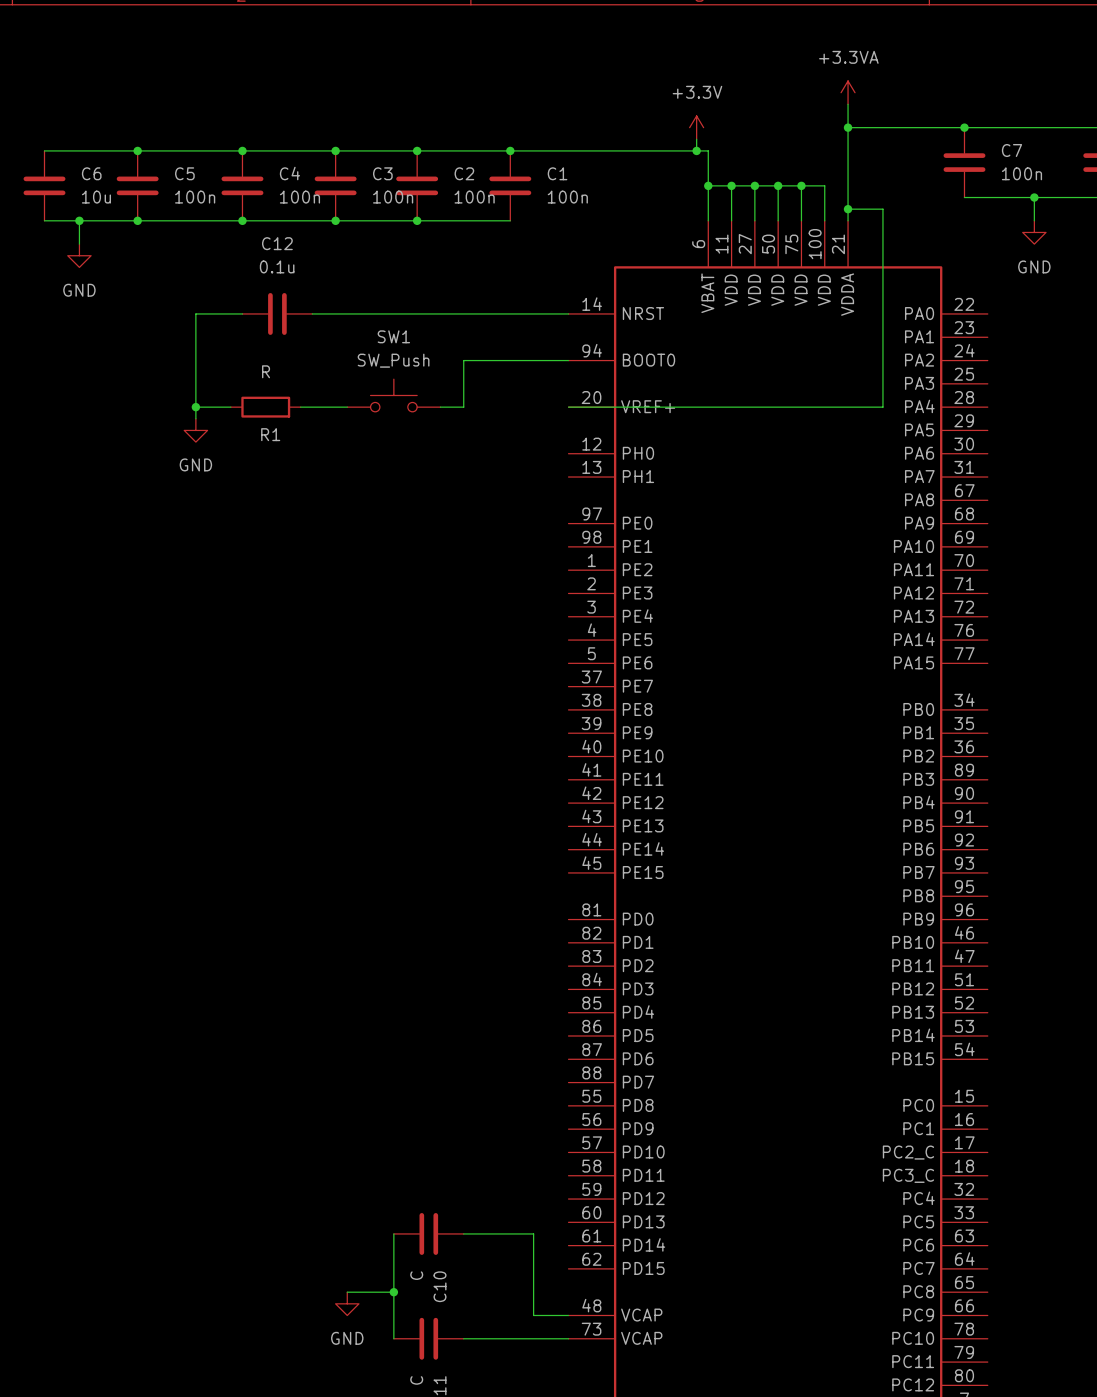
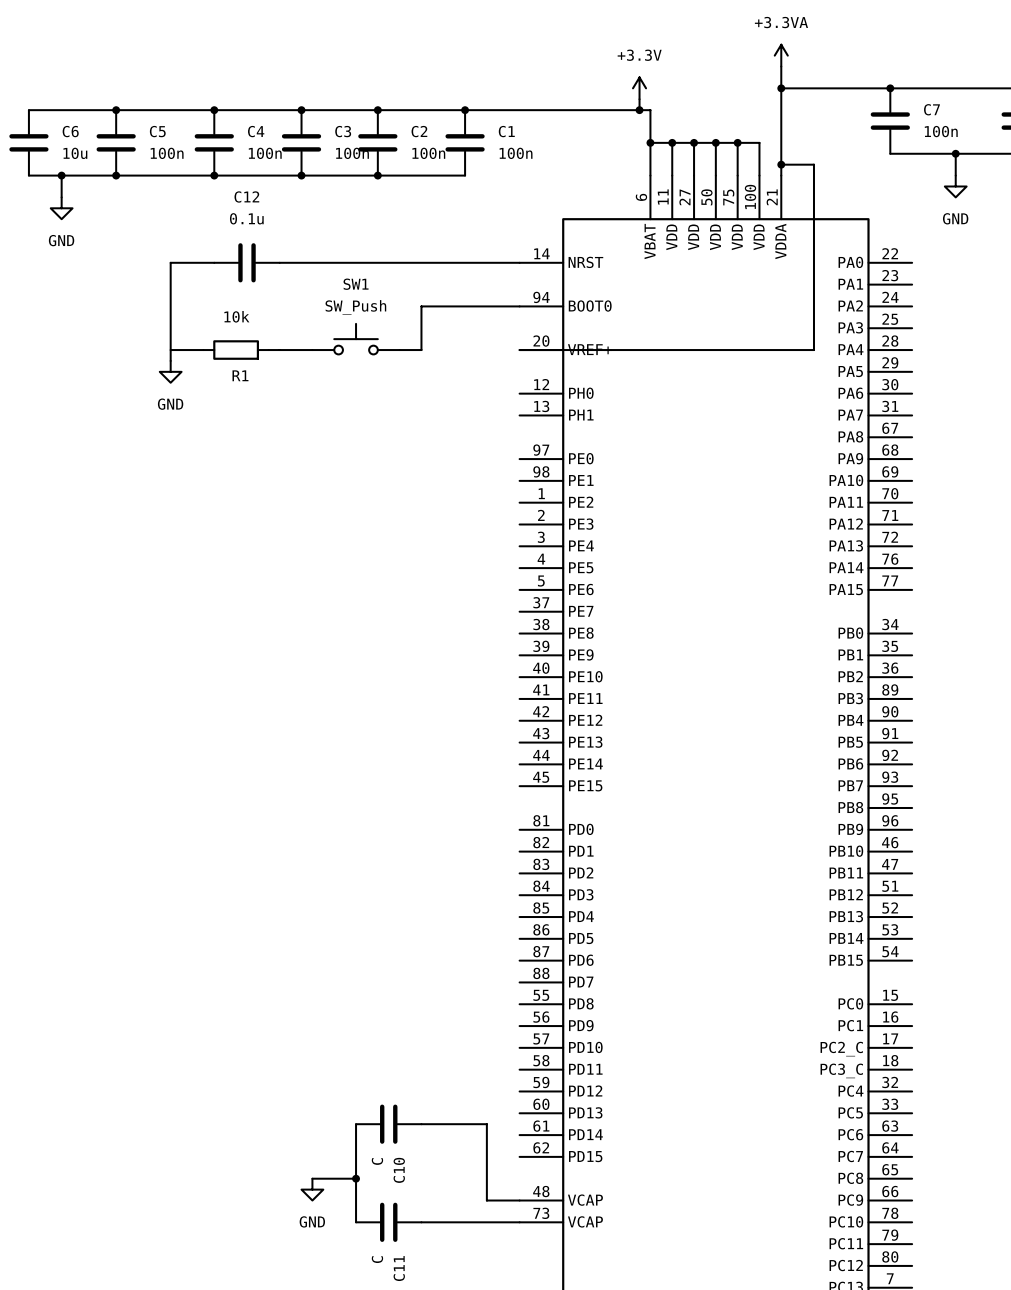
R1 value: R (266, 371) -> 10k (236, 316)
junction: (195, 407) -> none

